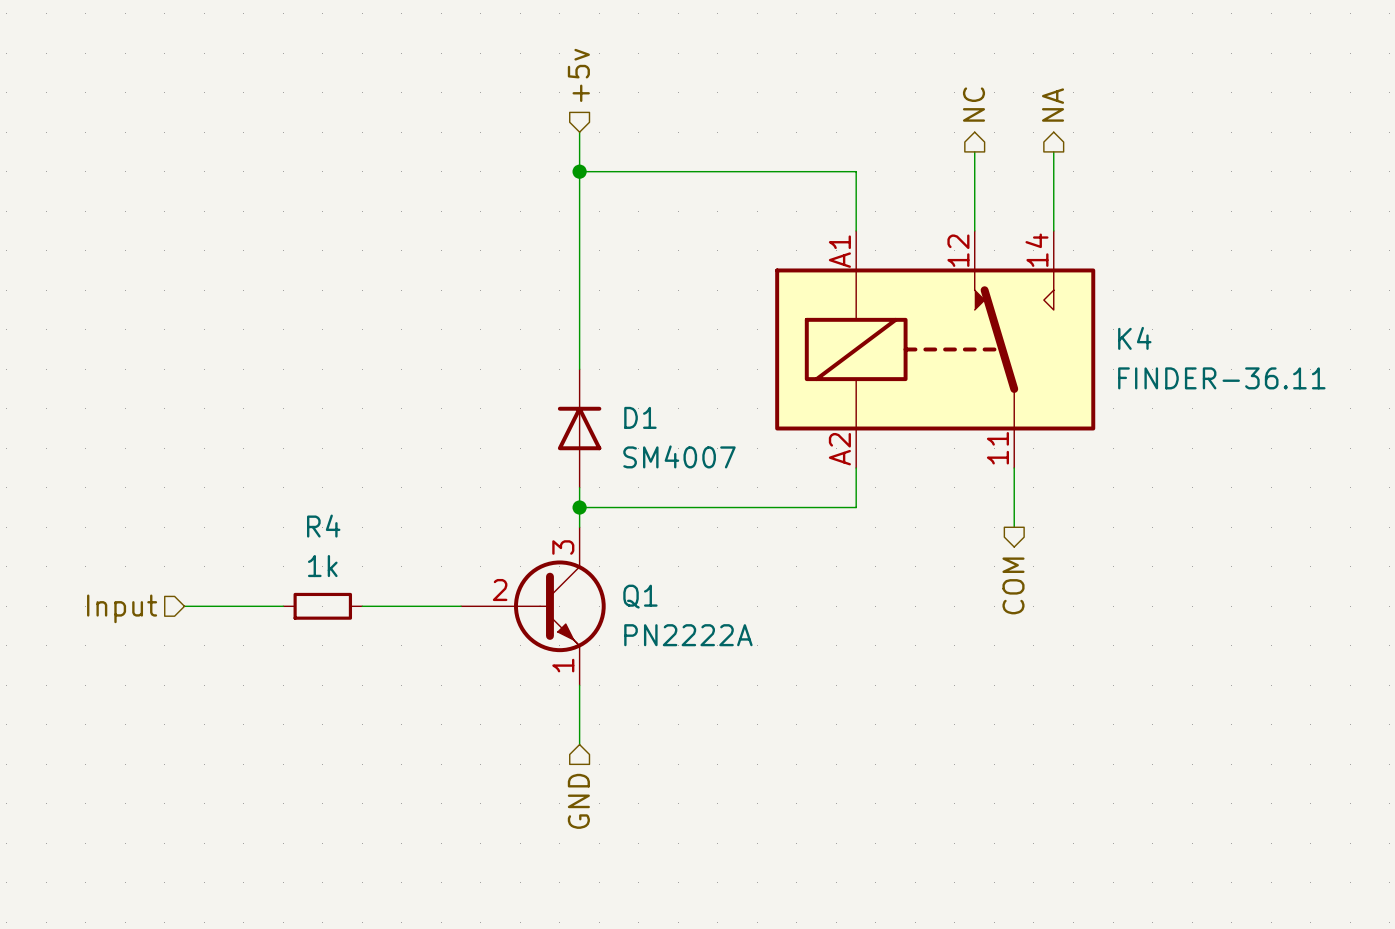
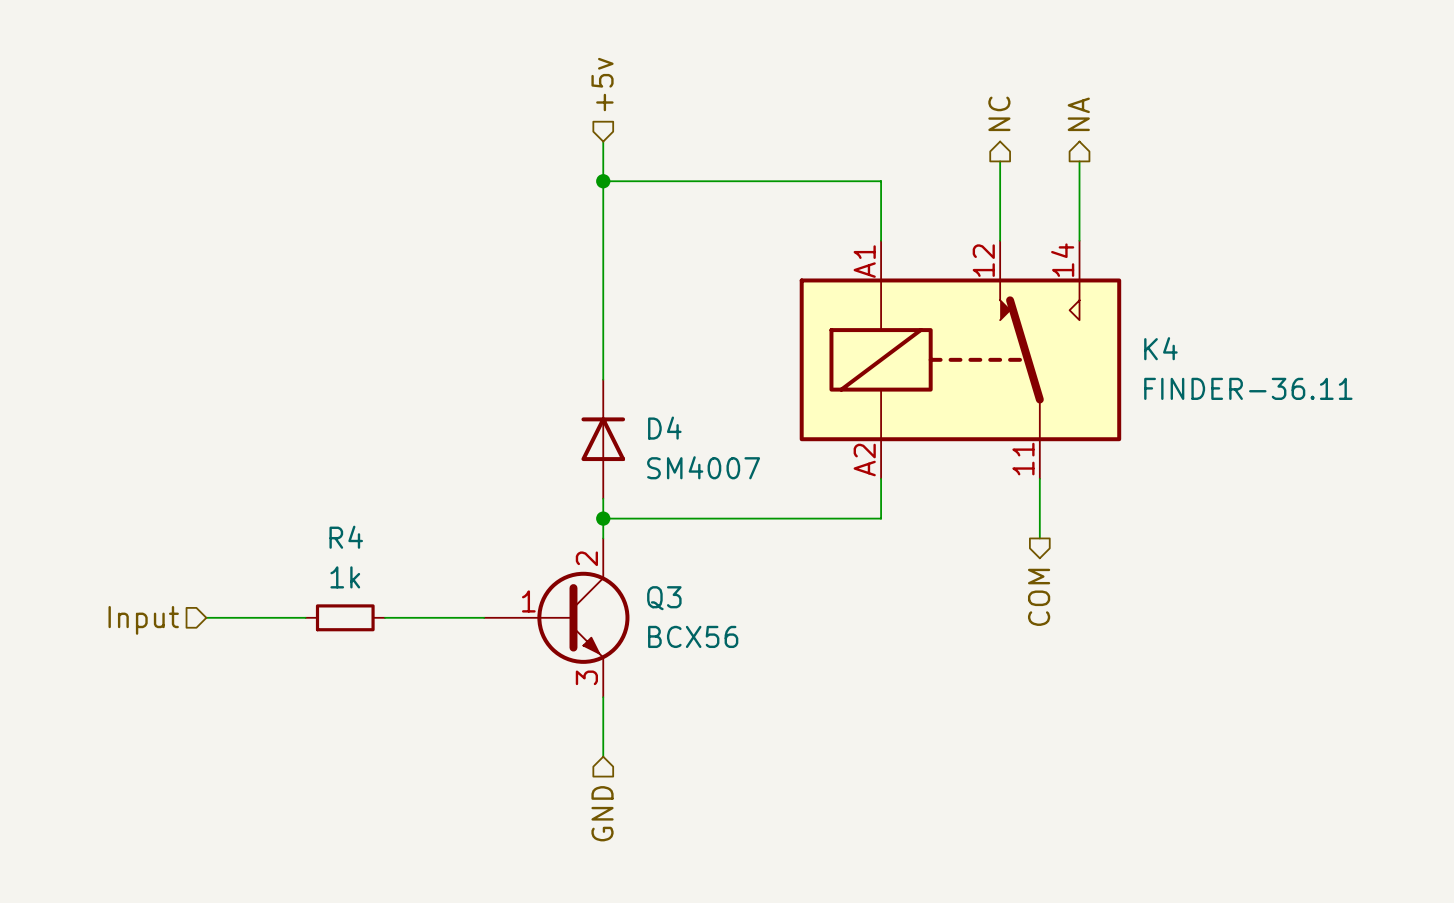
D1 name: D1 (640, 417) -> D4 (664, 428)
Q1: PN2222A (533, 606) -> none
Q3: none -> BCX56 (556, 617)

